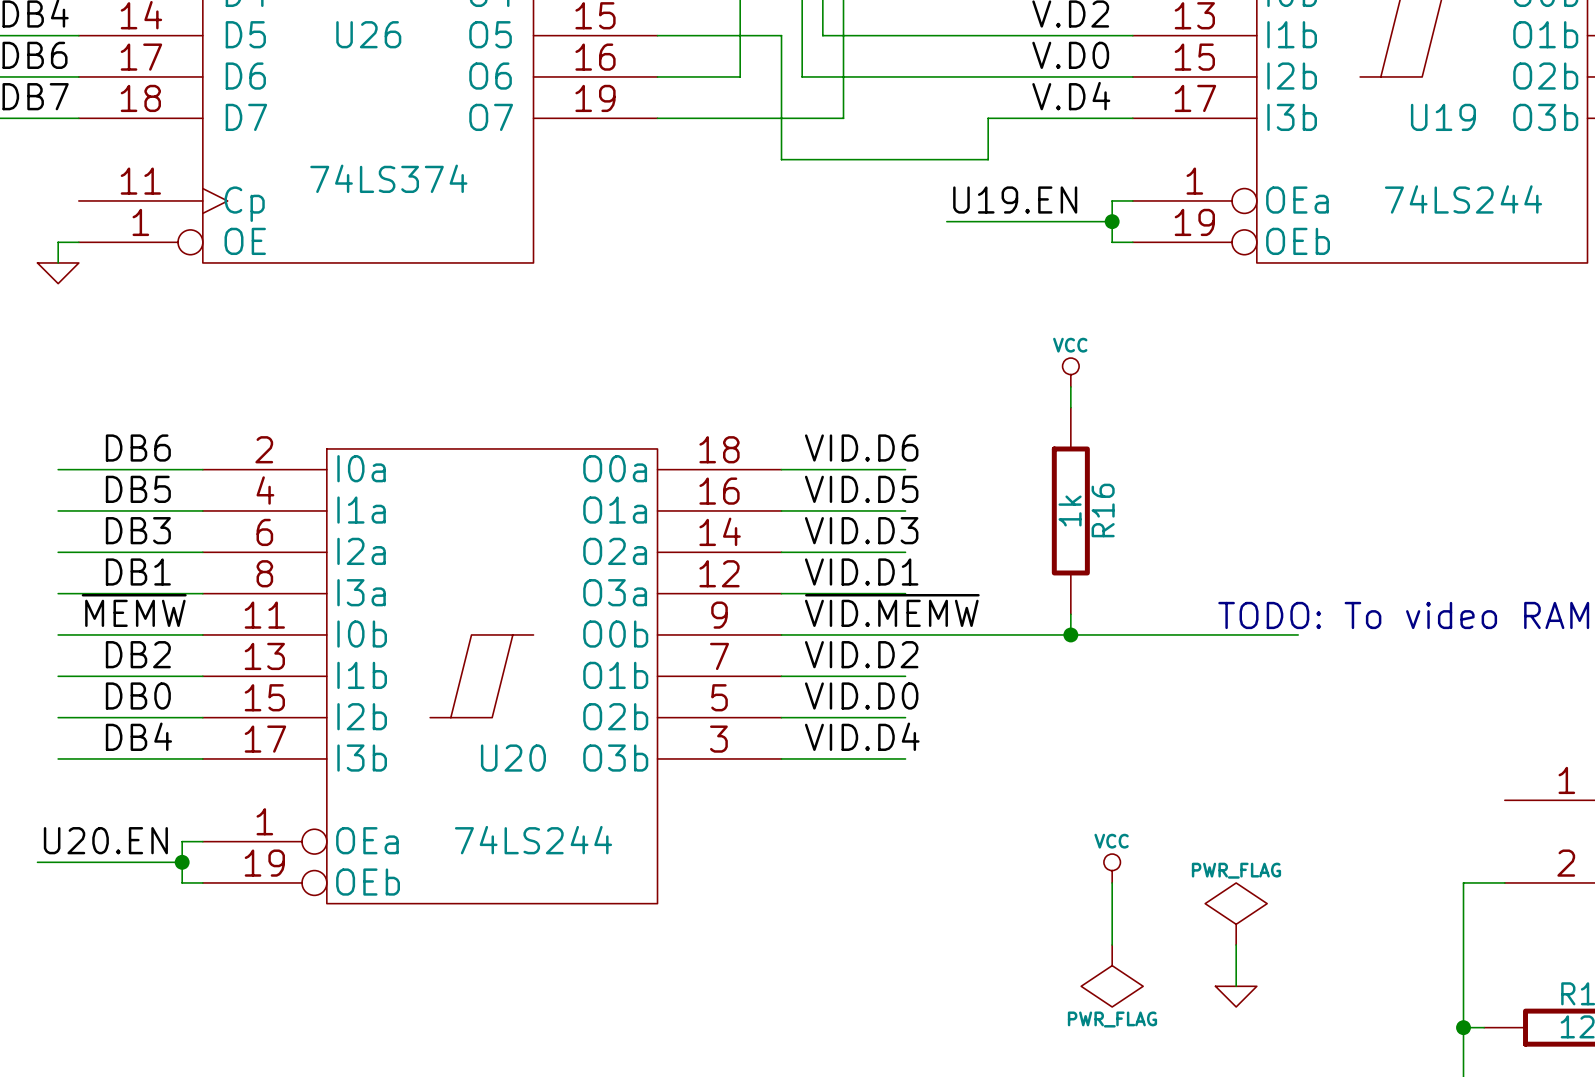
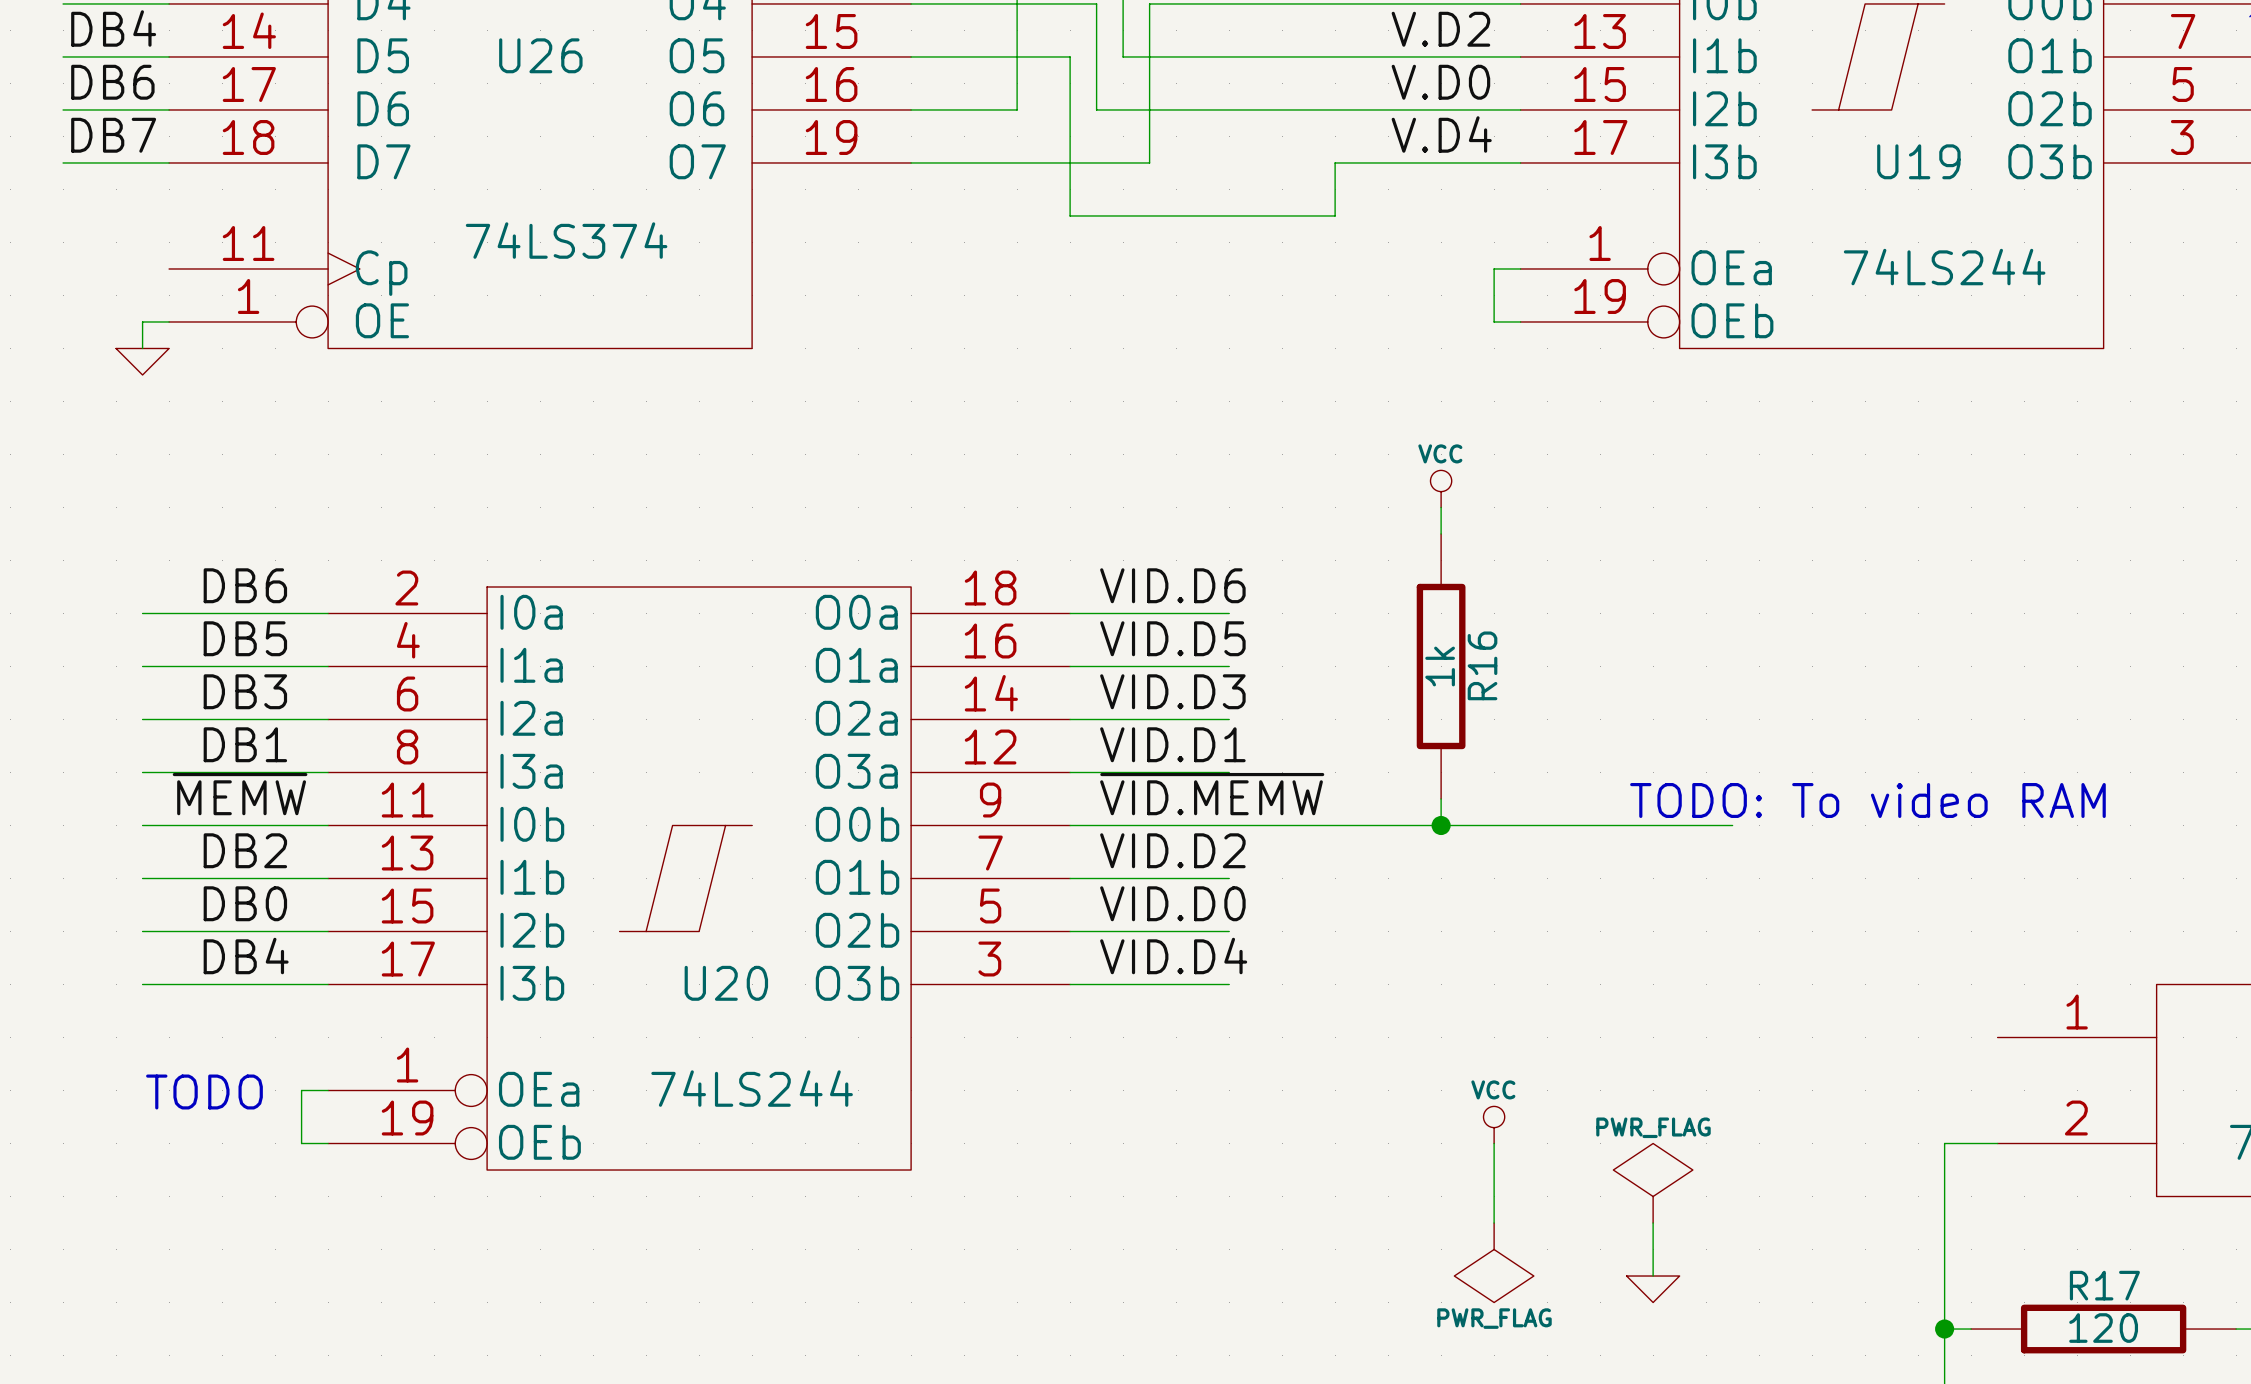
label: U19.EN (1015, 200) -> none
wire: (946, 221) (1112, 221) -> none
junction: (1112, 221) -> none
label: U20.EN (105, 840) -> none
text: none -> TODO (204, 1092)
wire: (37, 862) (182, 862) -> none
junction: (182, 862) -> none

